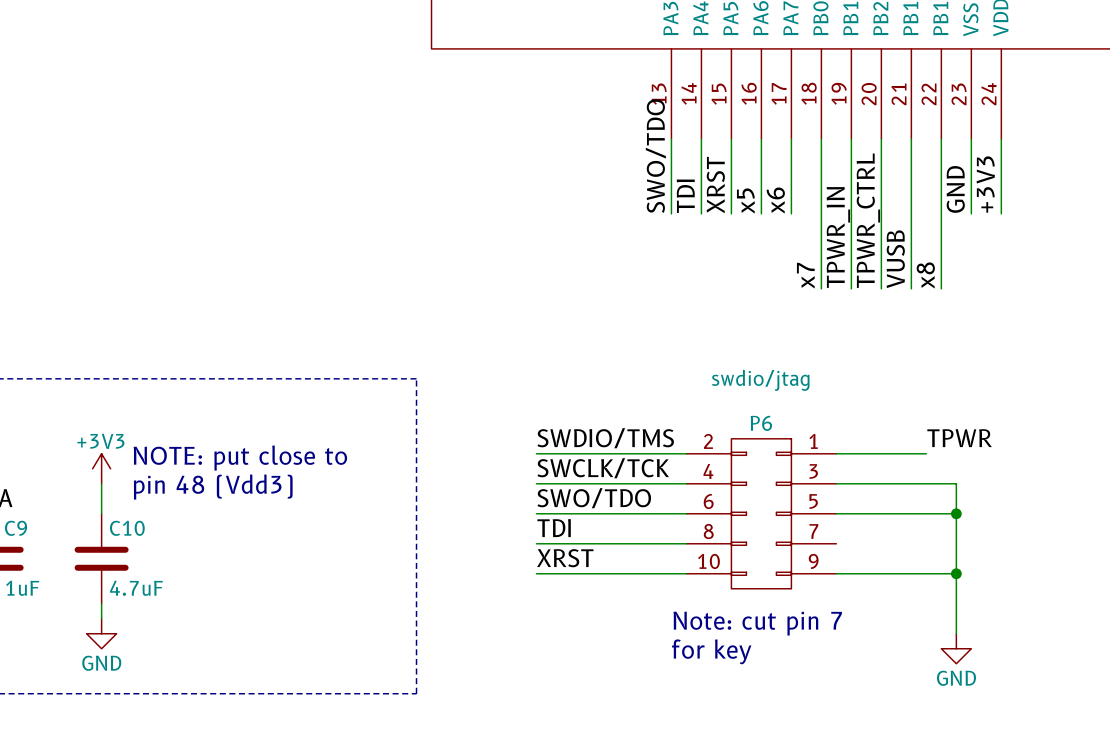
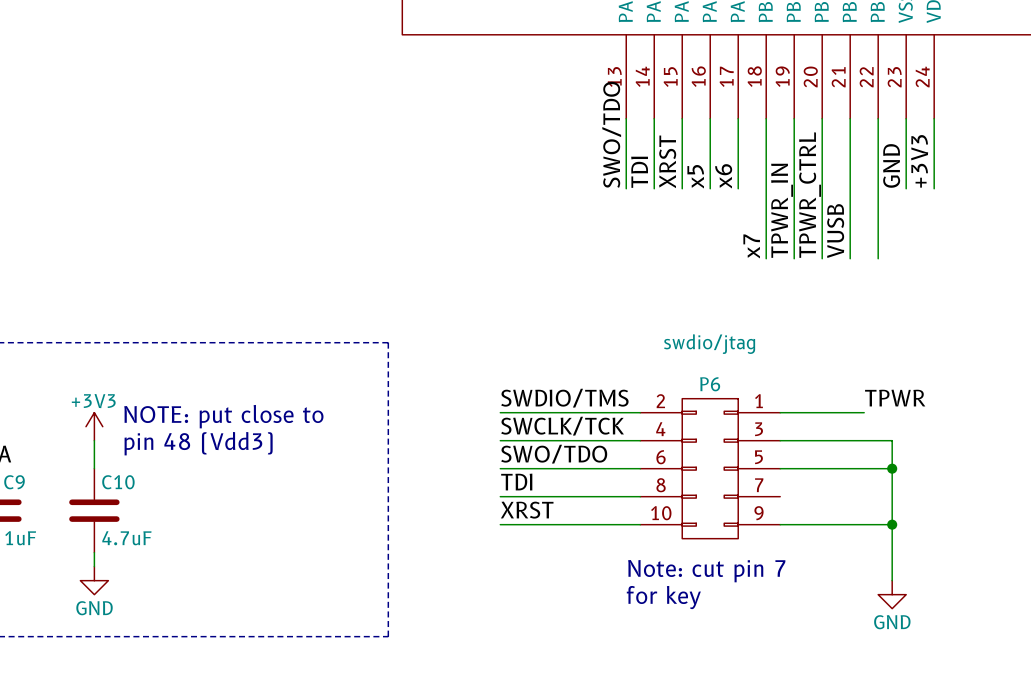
label: x8 (925, 275) -> none

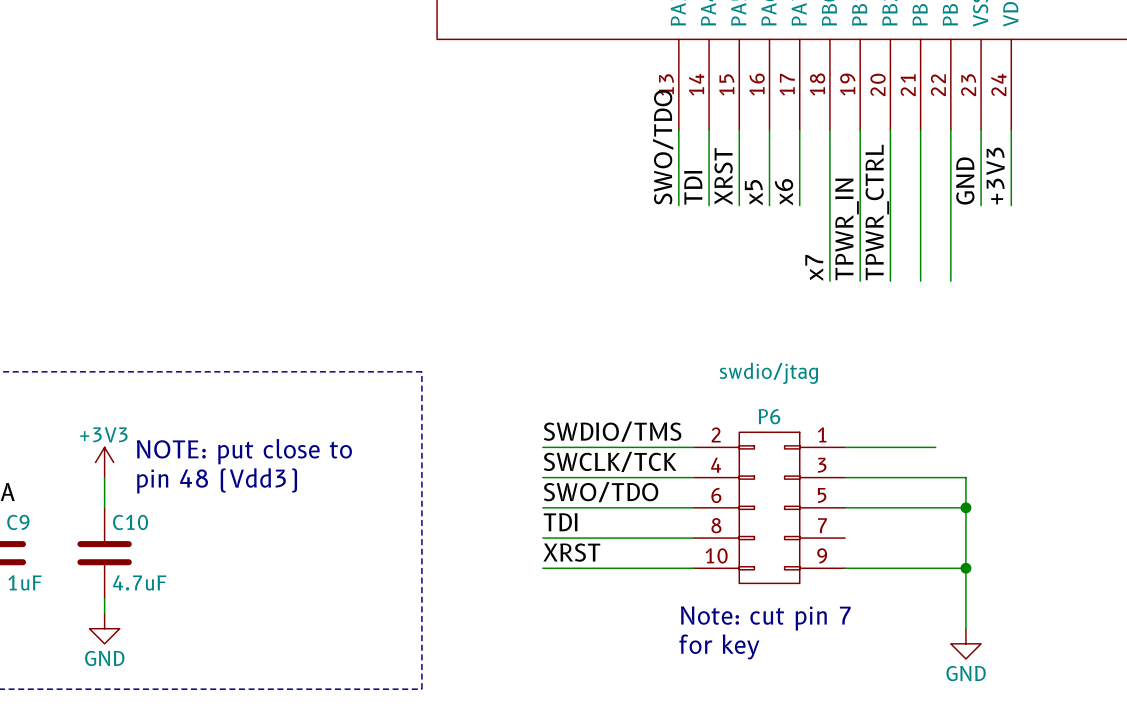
label: VUSB (835, 231) -> none
label: TPWR (895, 398) -> none

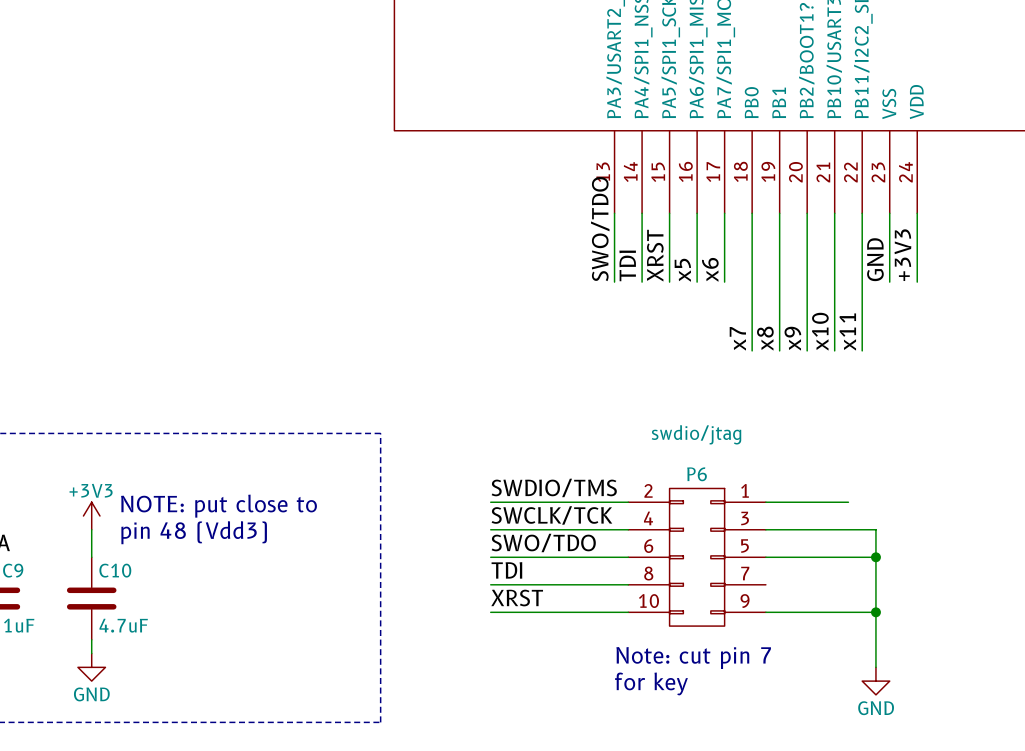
label: TPWR_CTRL (877, 212) -> x9 (792, 338)
label: TPWR_IN (847, 229) -> x8 (765, 338)
label: none -> x10 (820, 331)
label: none -> x11 (847, 332)

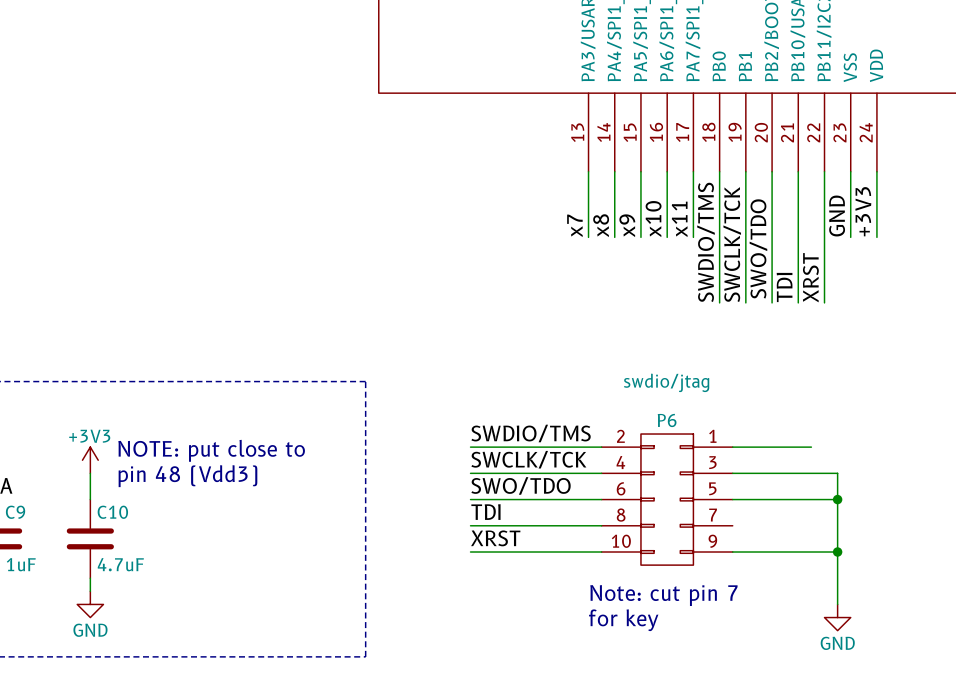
label: SWO/TDO (600, 229) -> x7 (574, 225)
label: XRST (655, 255) -> x9 (627, 225)
label: TDI (627, 265) -> x8 (601, 225)
label: x6 (710, 269) -> x11 (679, 219)
label: x5 (682, 270) -> x10 (653, 219)
label: none -> SWO/TDO (758, 248)
label: x10 (820, 331) -> TDI (784, 287)
label: x11 (847, 332) -> XRST (810, 277)
label: x7 (737, 338) -> SWDIO/TMS (706, 242)
label: x8 (765, 338) -> SWCLK/TCK (732, 244)
label: x9 (792, 338) -> none

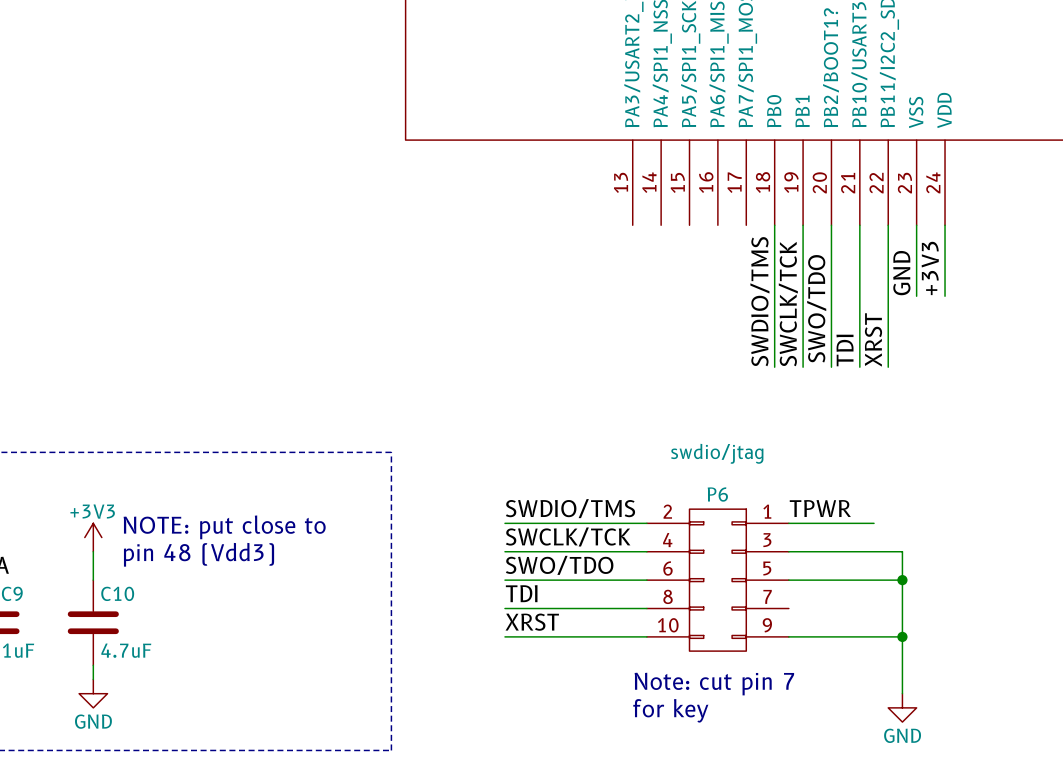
wire: (588, 171) (588, 237) -> none
wire: (614, 171) (614, 237) -> none
wire: (640, 171) (640, 237) -> none
wire: (667, 171) (667, 237) -> none
wire: (693, 171) (693, 237) -> none
label: x10 (653, 219) -> none
label: x11 (679, 219) -> none
label: x7 (574, 225) -> none
label: x8 (601, 225) -> none
label: x9 (627, 225) -> none
label: none -> TPWR (820, 508)

